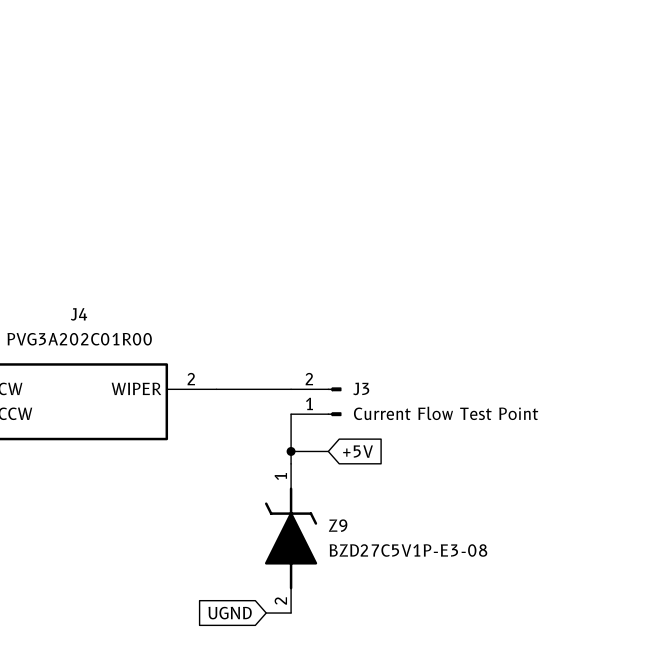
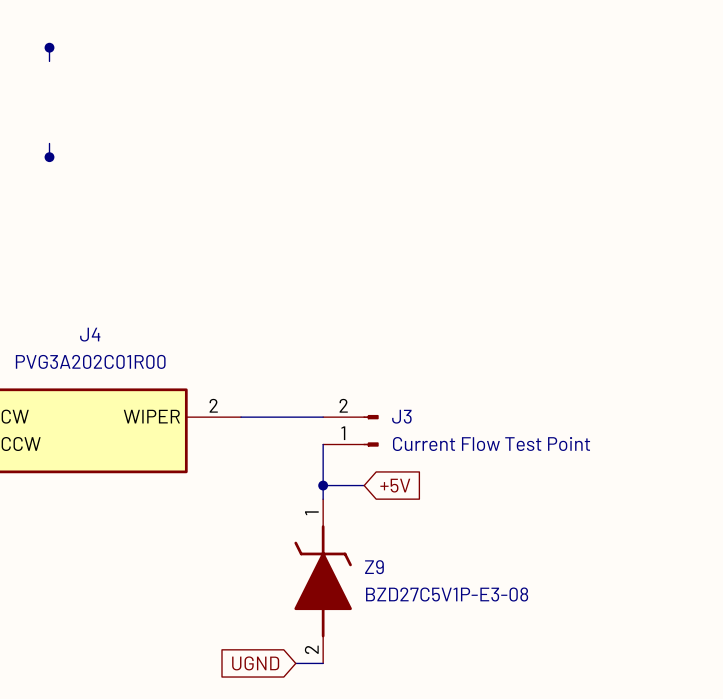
wire: none -> (49, 47) (49, 61)
junction: none -> (49, 47)
wire: none -> (49, 143) (49, 157)
junction: none -> (49, 157)

